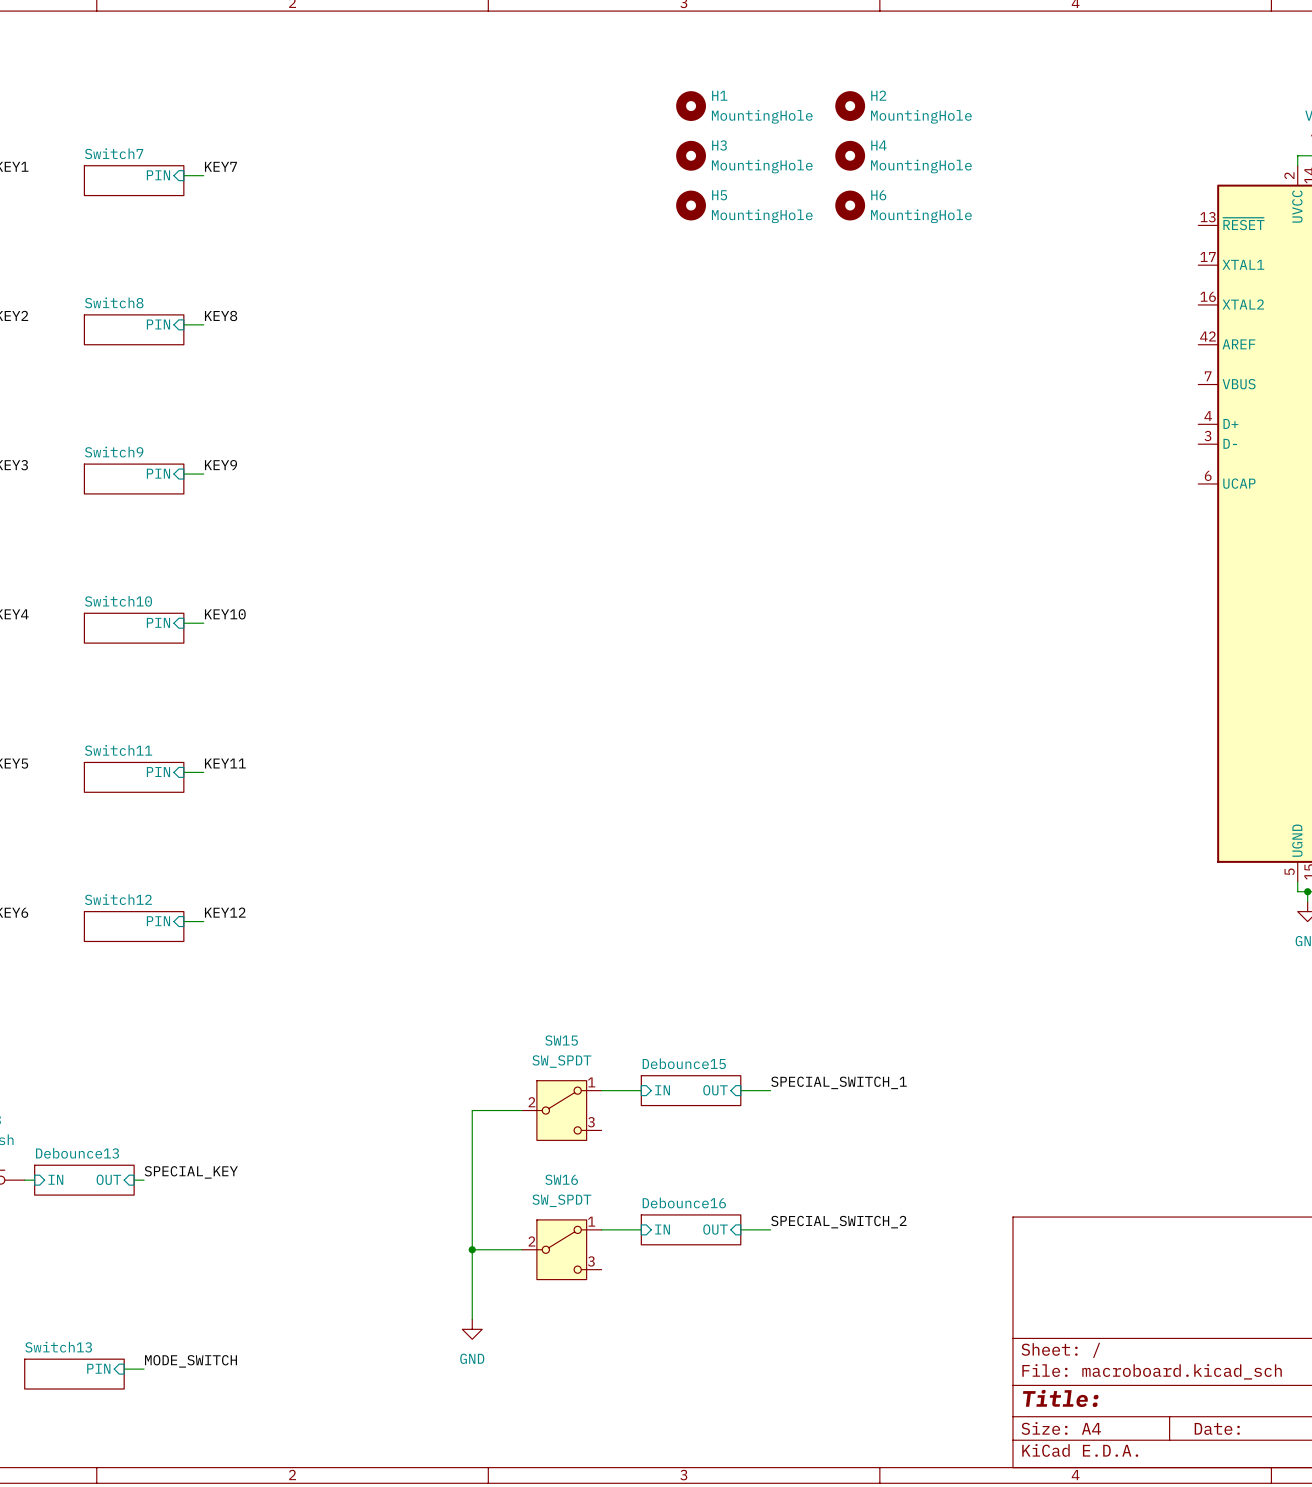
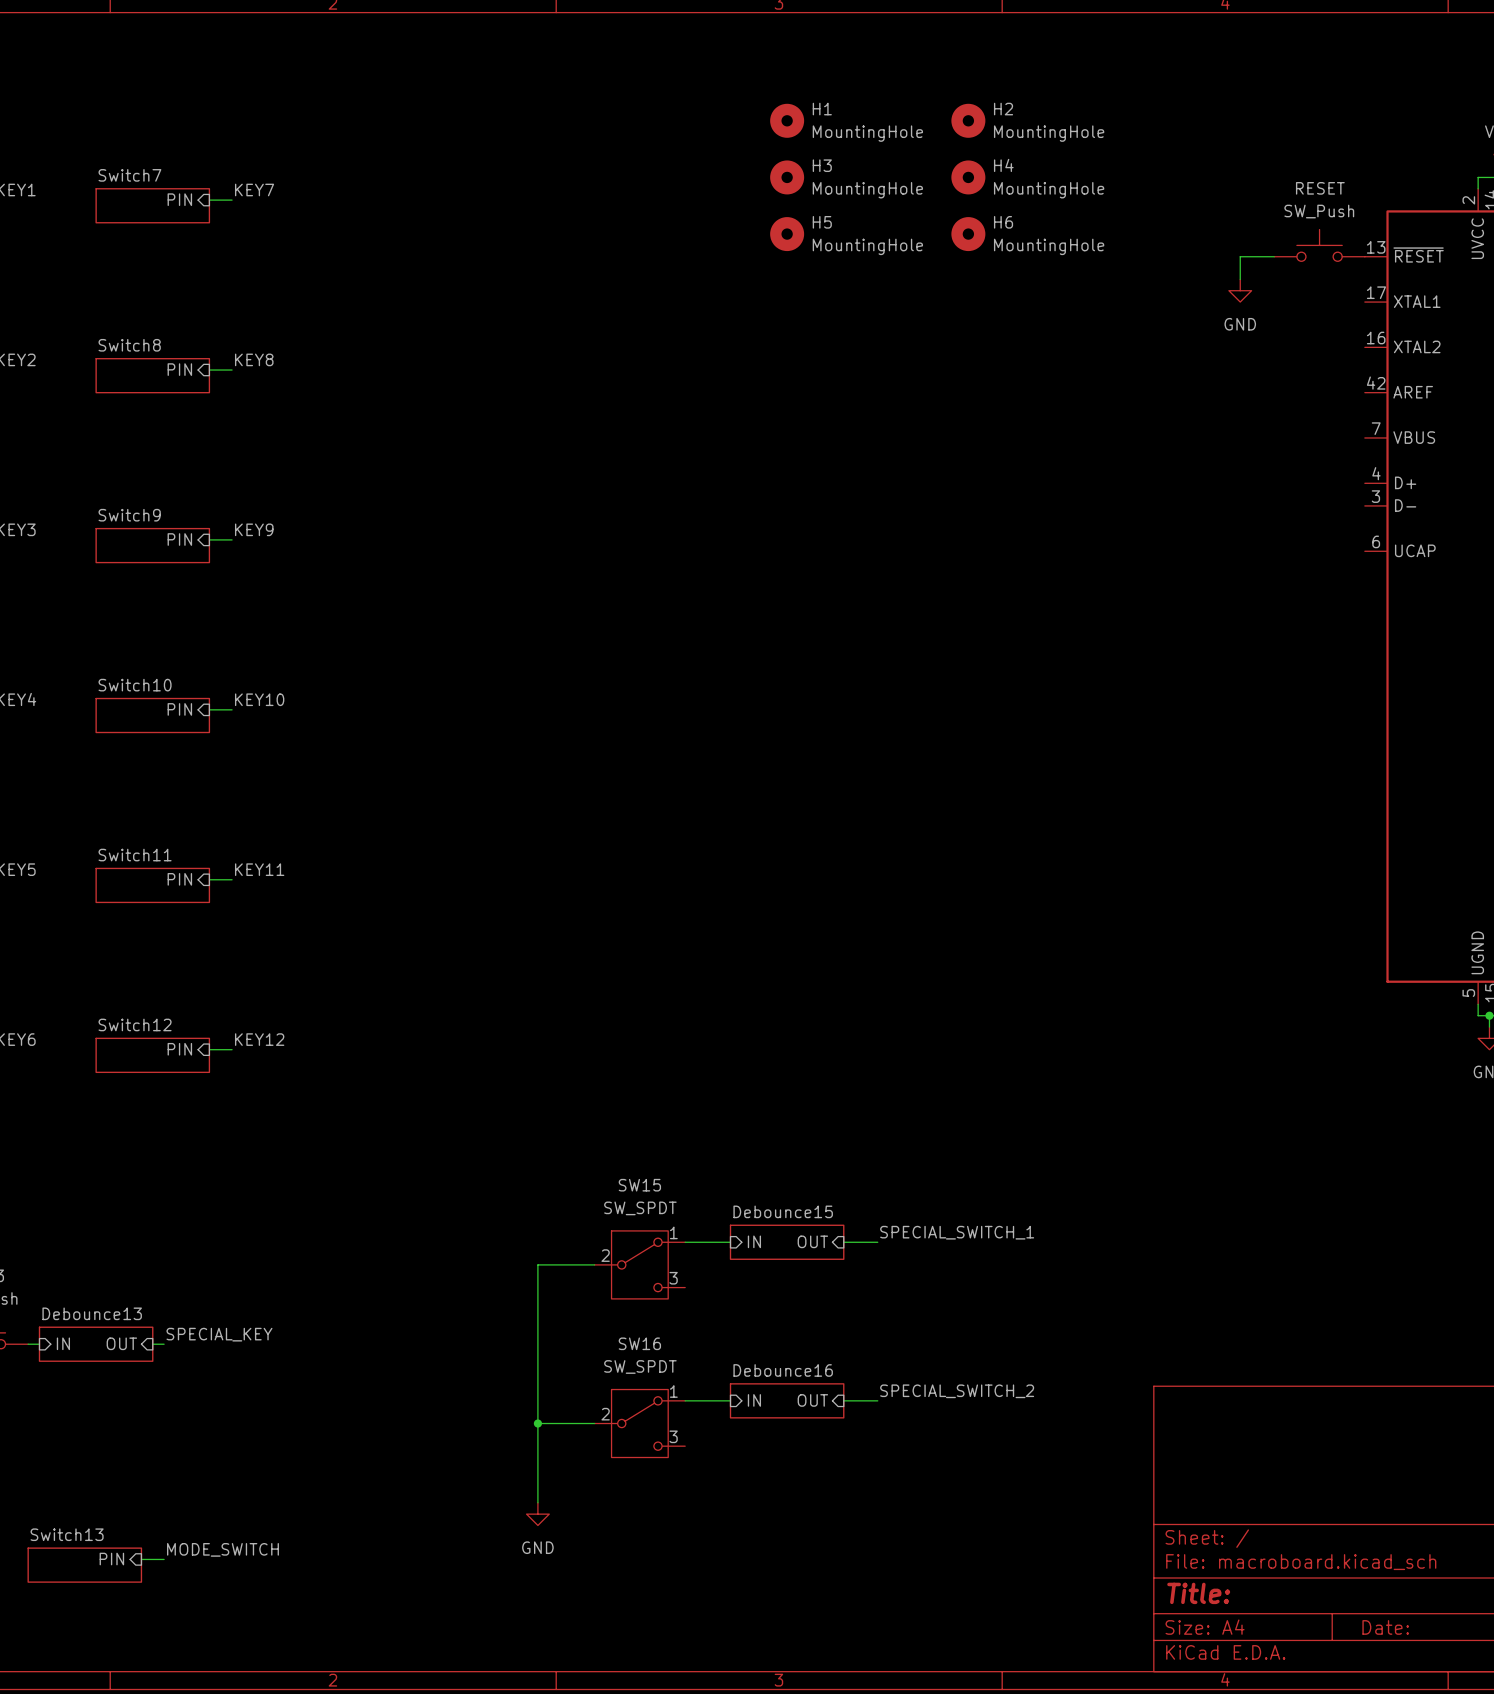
RESET: none -> SW_Push (1319, 245)
wire: none -> (1274, 256) (1240, 256) (1240, 279)
power symbol: none -> GND (1240, 290)

